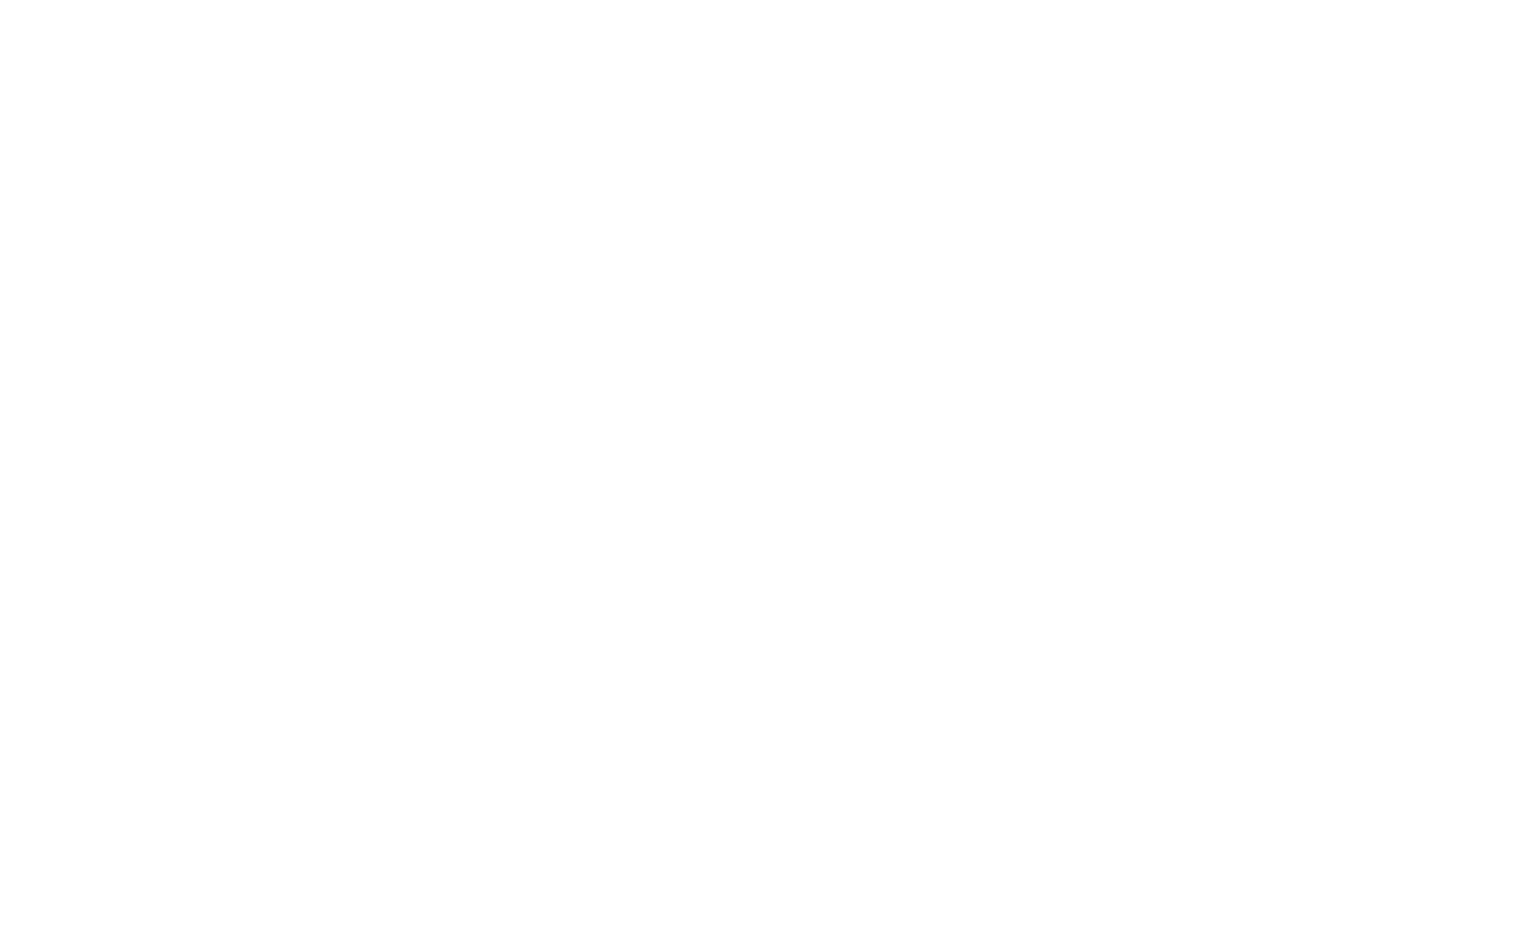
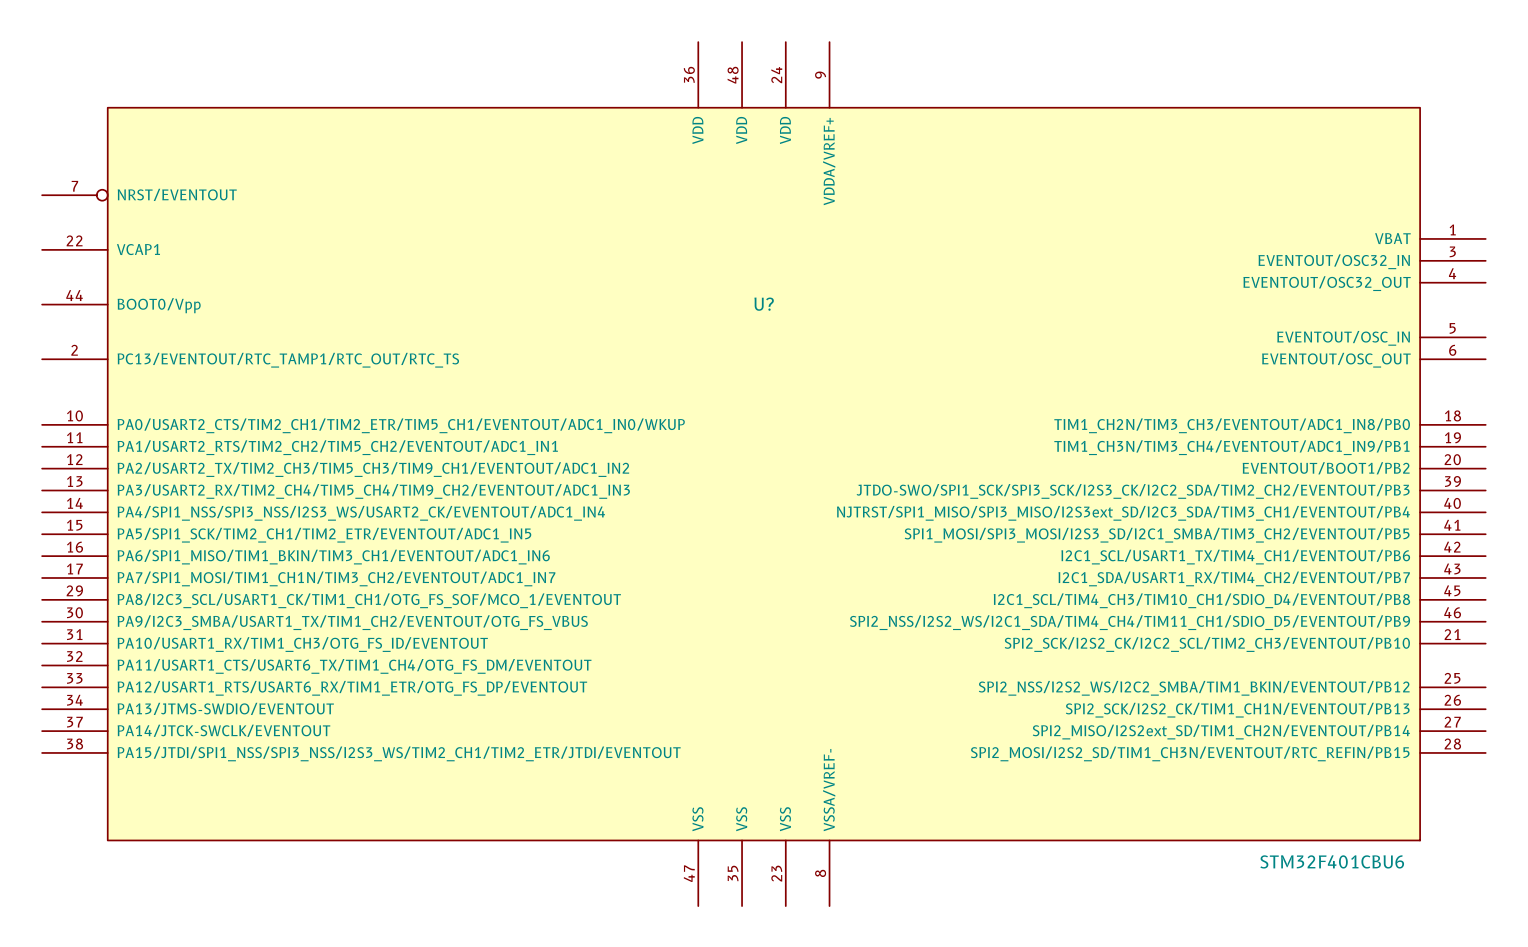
U?: none -> STM32F401CBU6 (763, 474)

